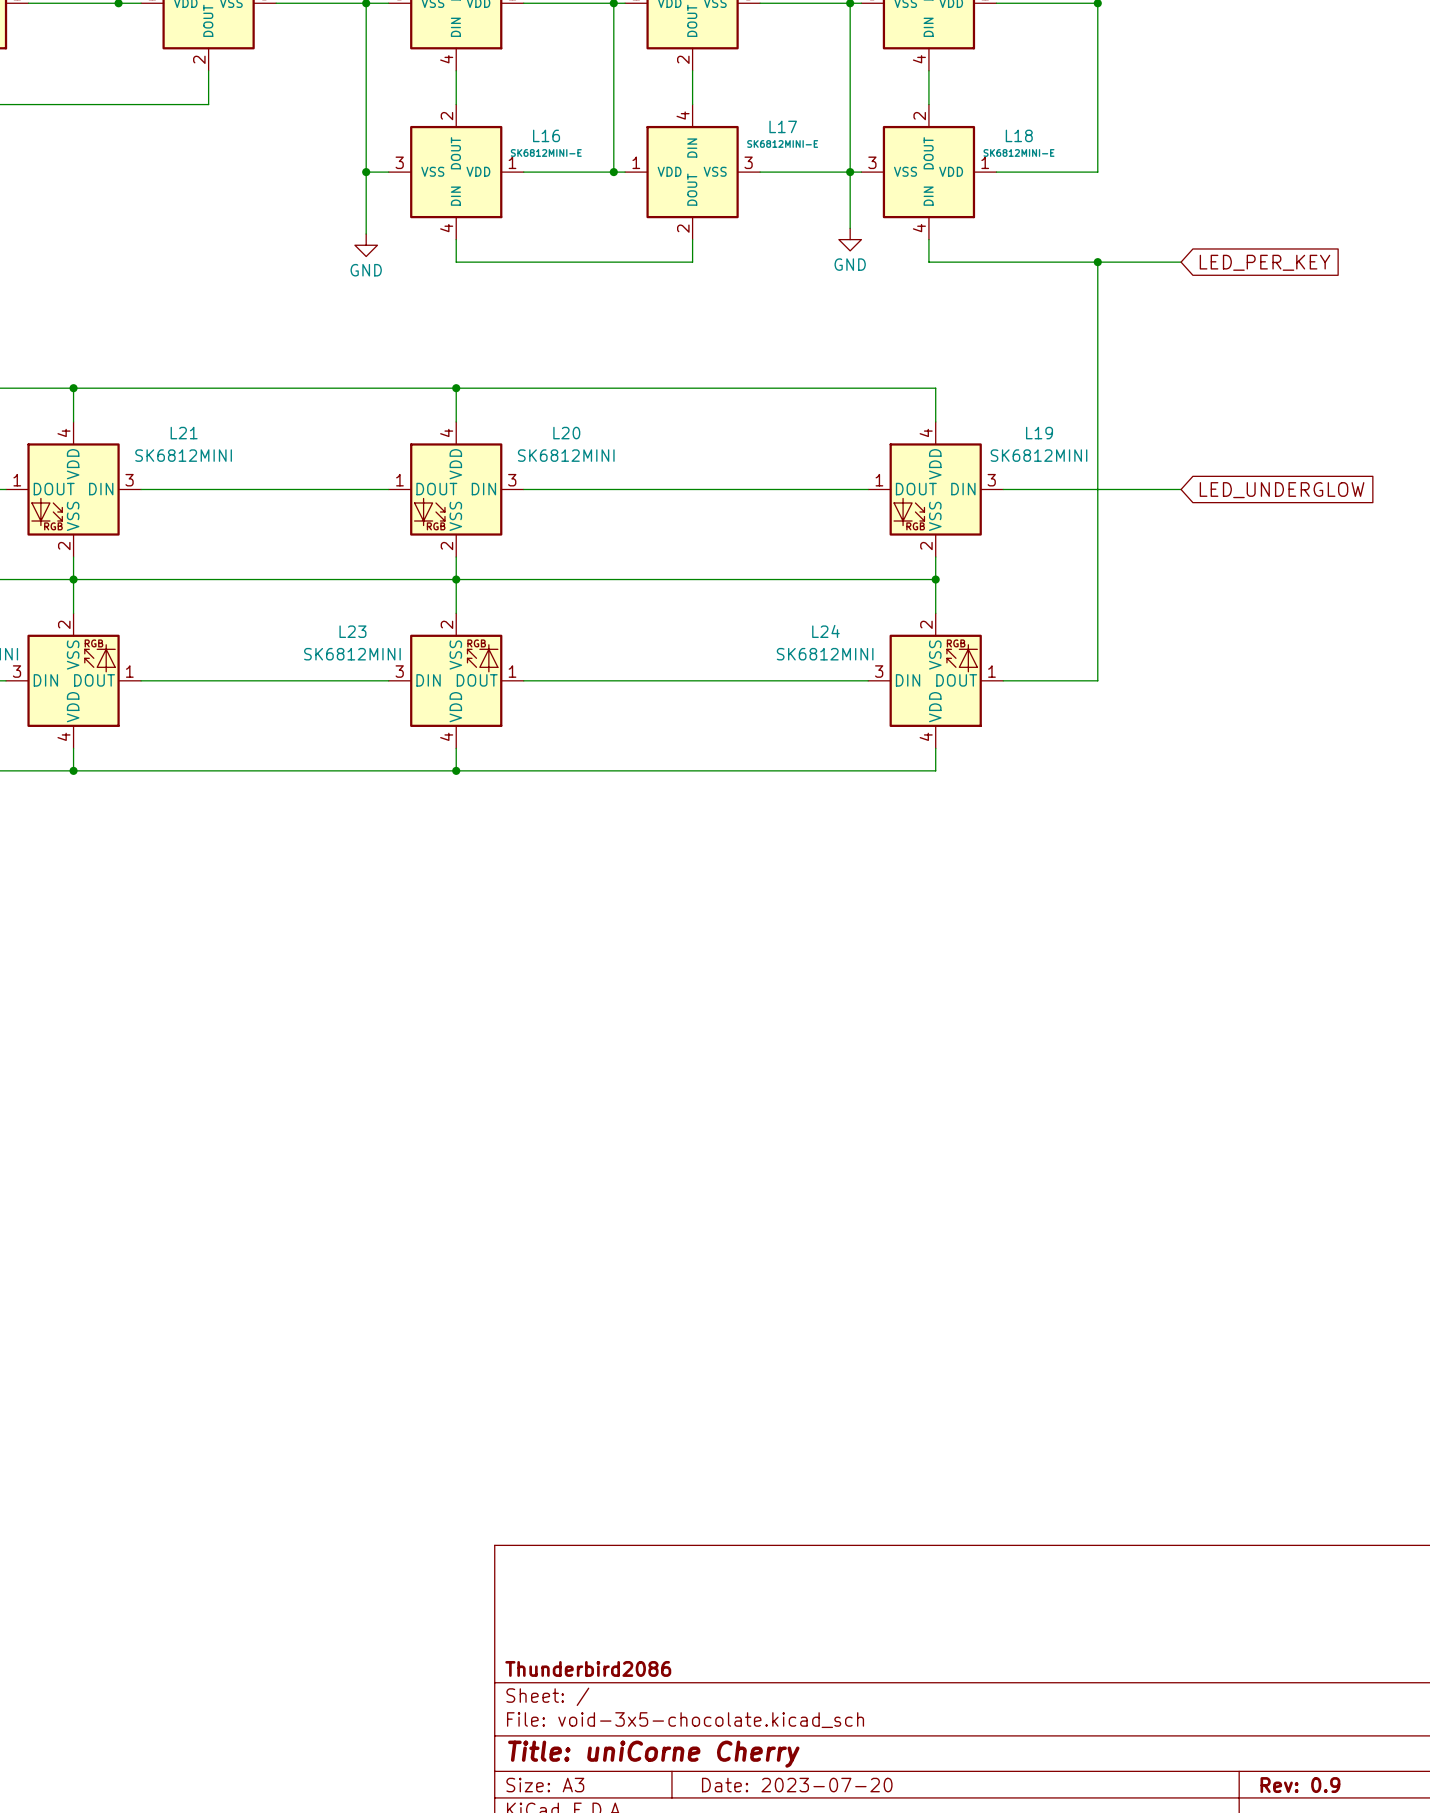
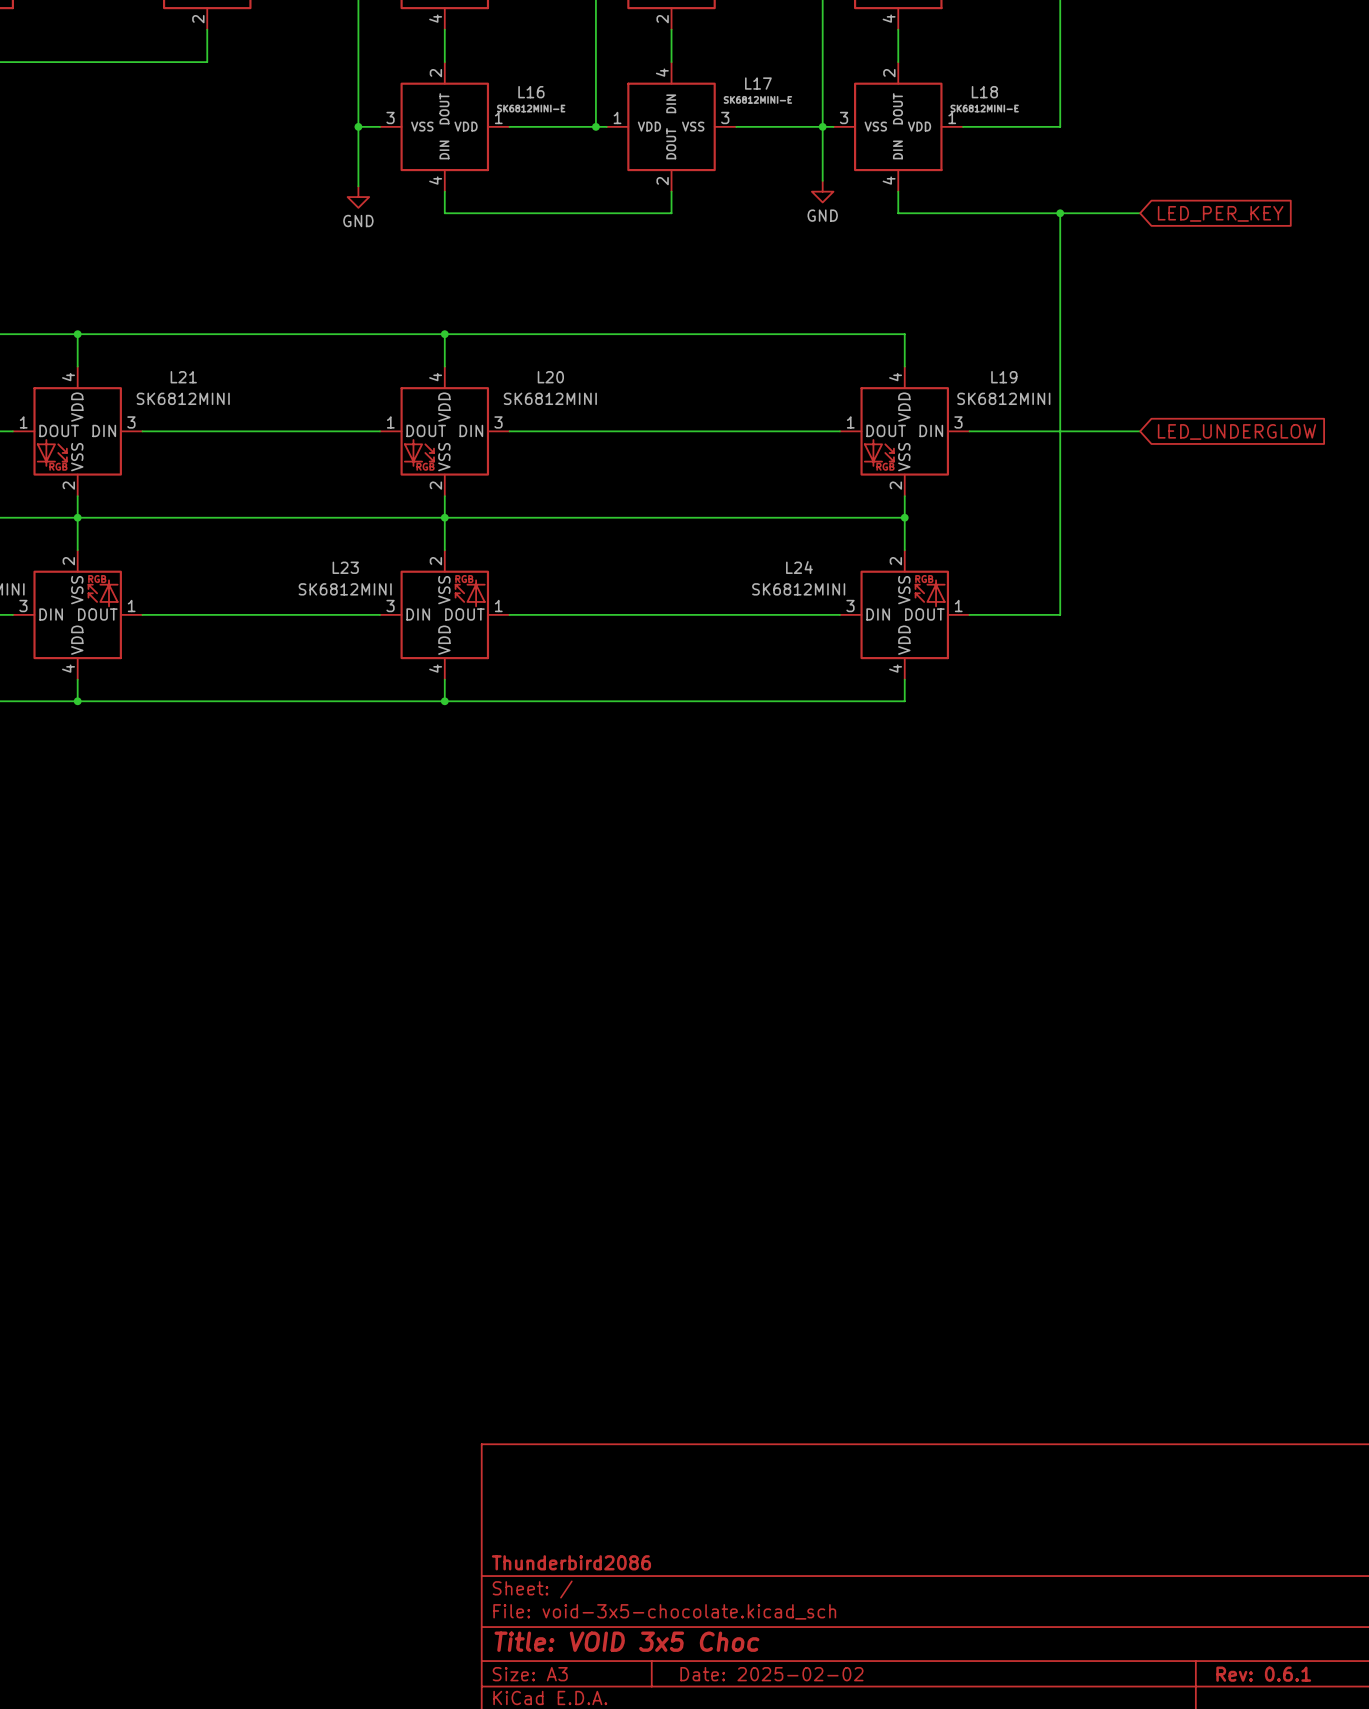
title block: Title: uniCorne Cherry (653, 1754) -> Title: VOID 3x5 Choc (626, 1641)
title block: Date: 2023-07-20 (797, 1785) -> Date: 2025-02-02 (771, 1674)
title block: Rev: 0.9 (1300, 1785) -> Rev: 0.6.1 (1263, 1674)

